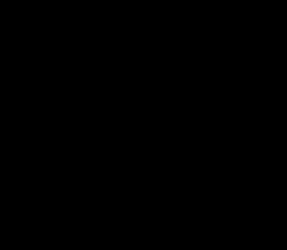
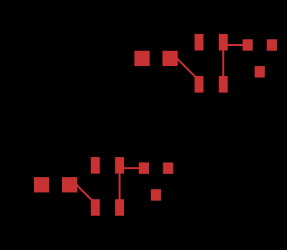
part: none -> (211, 42)
top track: none -> (247, 45) (226, 45) (223, 42) (223, 84)
part: none -> (156, 58)
top track: none -> (170, 58) (176, 58) (199, 80) (199, 84)
part: none -> (259, 58)
part: none -> (211, 84)
part: none -> (107, 165)
top track: none -> (143, 168) (122, 168) (119, 165) (119, 207)
part: none -> (156, 181)
part: none -> (55, 184)
top track: none -> (69, 184) (76, 184) (95, 203) (95, 207)
part: none -> (107, 207)

